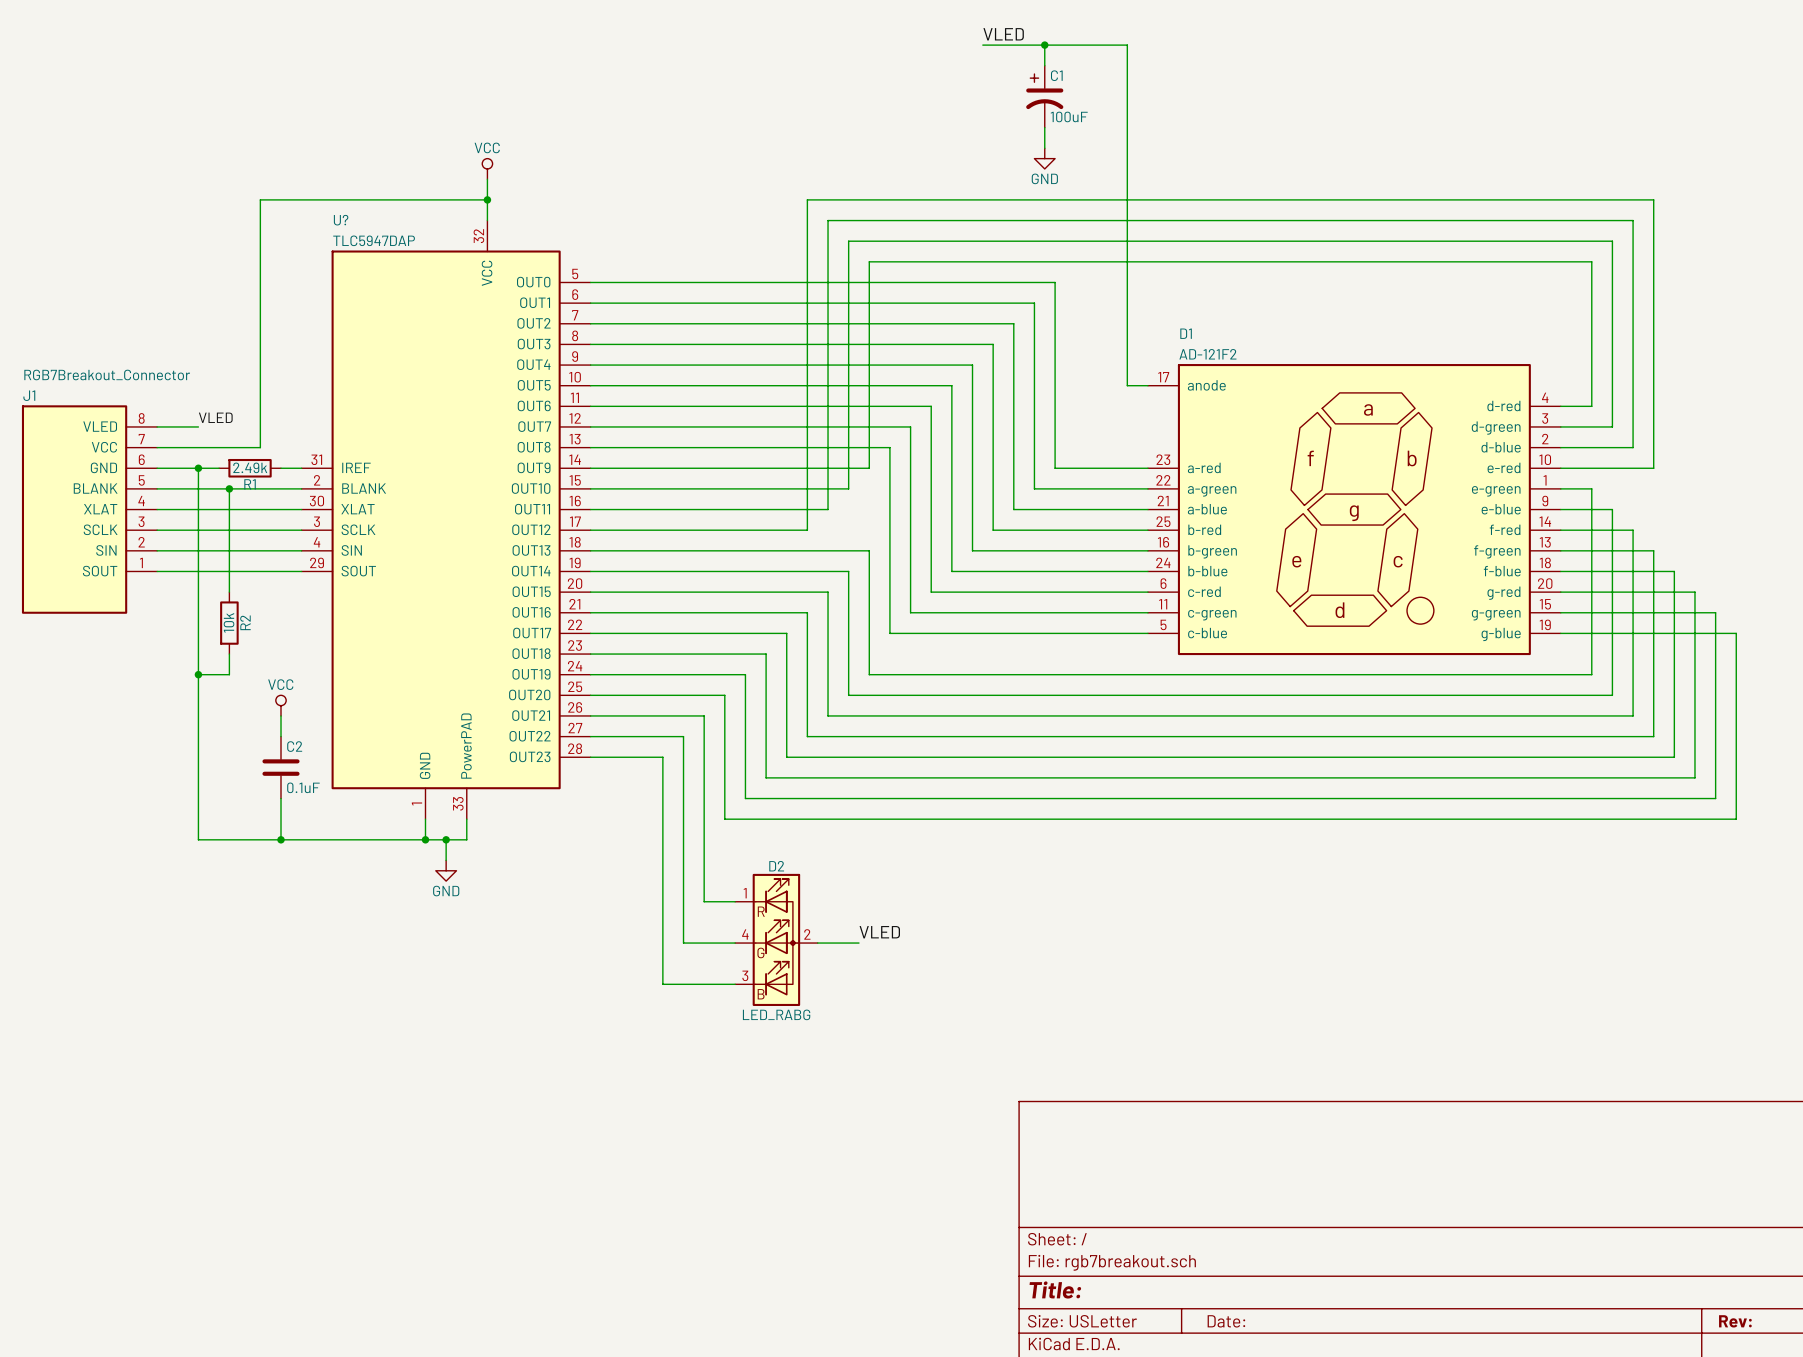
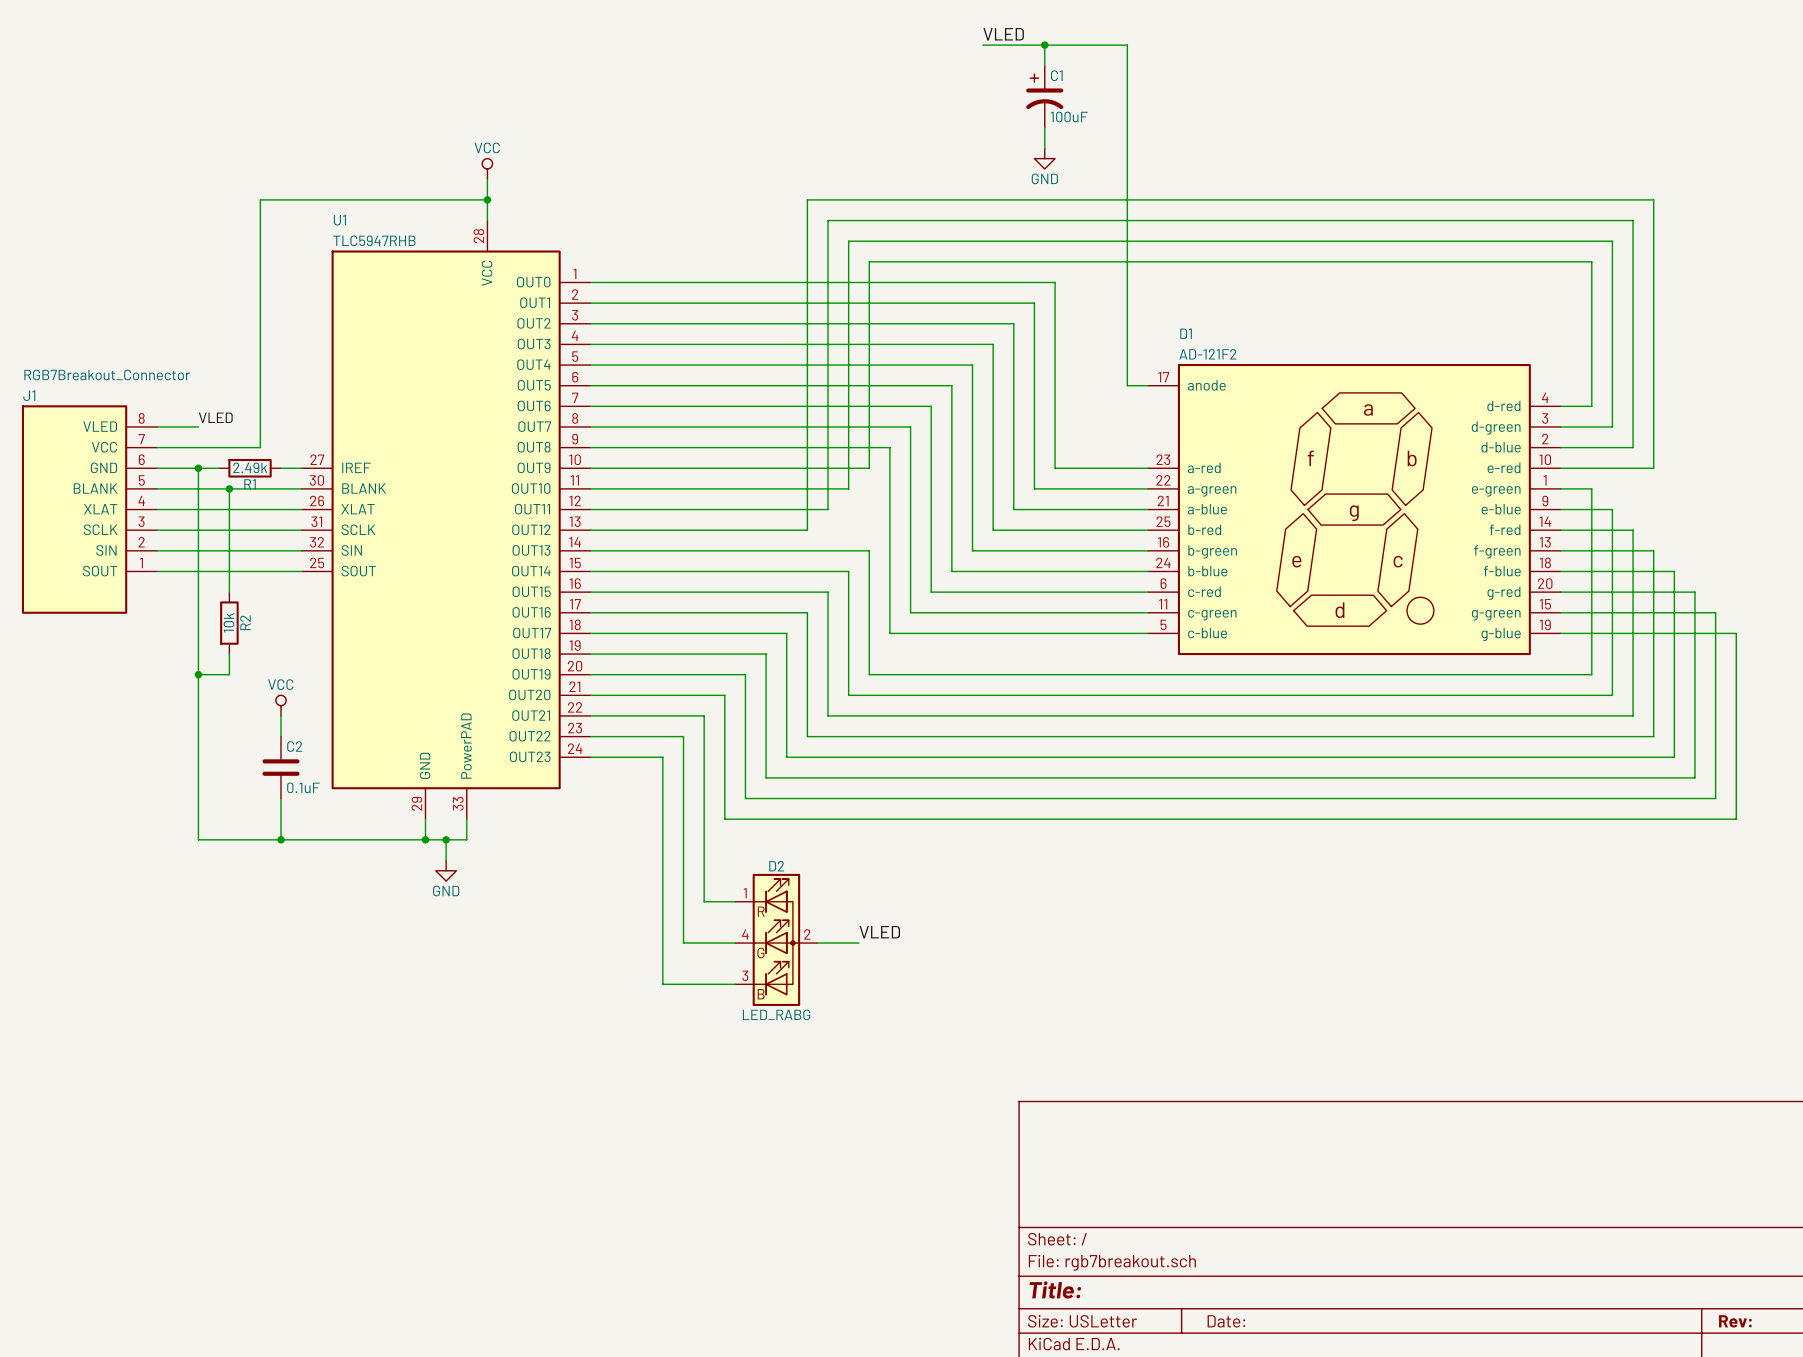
U? symbol: [301, 220, 591, 820] -> [301, 220, 591, 820]
U? name: U? (341, 220) -> U1 (339, 220)
U? value: TLC5947DAP (374, 240) -> TLC5947RHB (374, 240)

